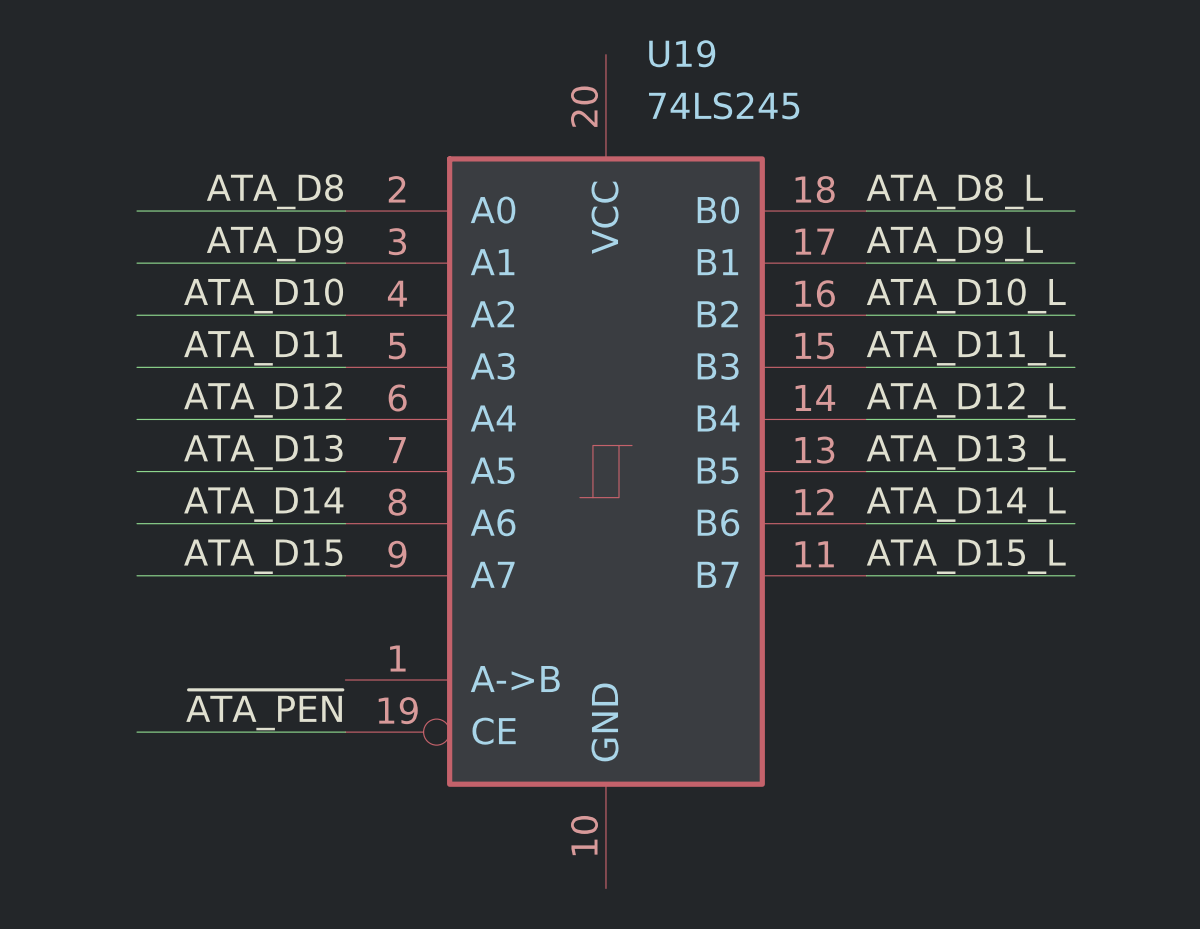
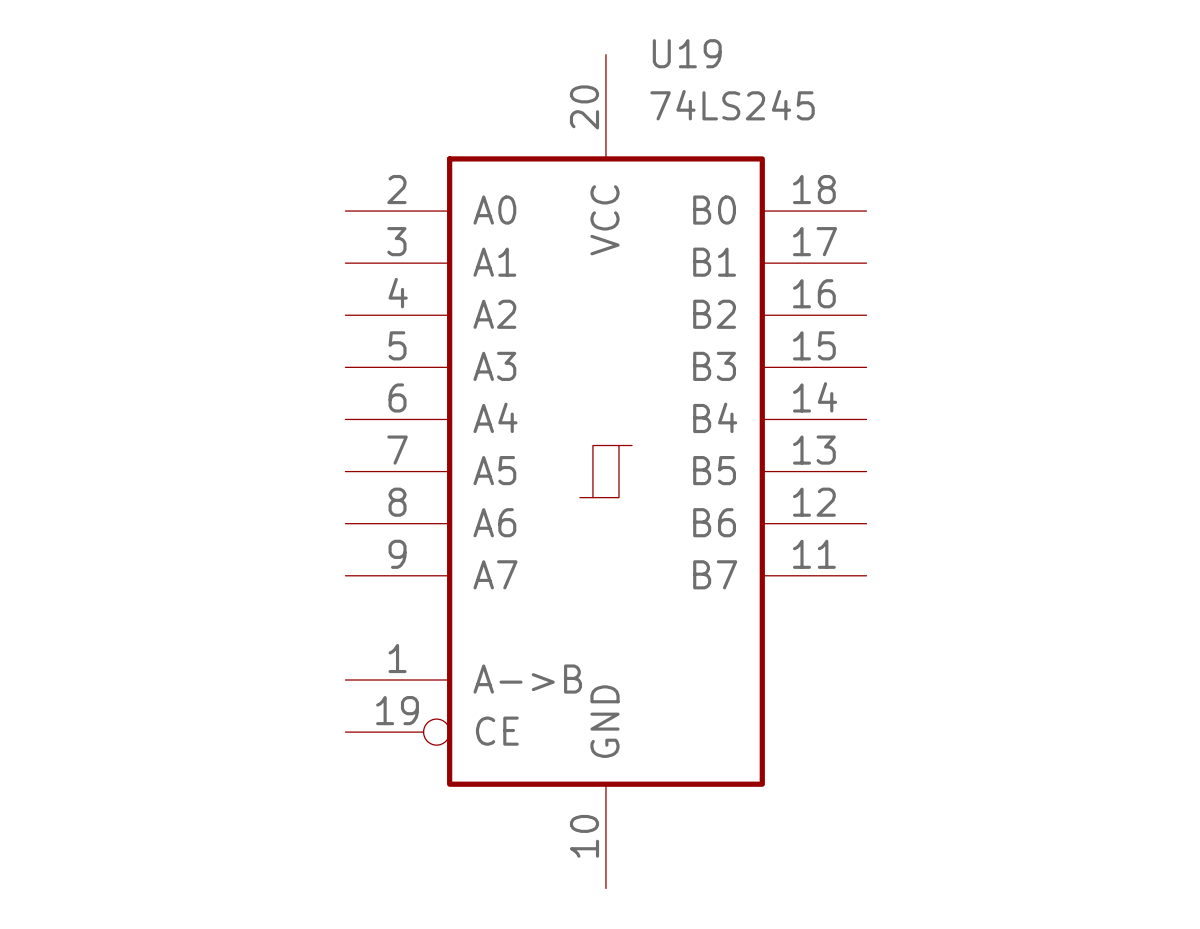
label: ATA_D8 (274, 191) -> none
label: ATA_D8_L (954, 191) -> none
wire: (136, 211) (345, 211) -> none
wire: (866, 211) (1074, 211) -> none
label: ATA_D9 (274, 243) -> none
label: ATA_D9_L (954, 243) -> none
wire: (136, 263) (345, 263) -> none
wire: (866, 263) (1074, 263) -> none
label: ATA_D10 (263, 295) -> none
label: ATA_D10_L (966, 295) -> none
wire: (136, 315) (345, 315) -> none
wire: (866, 315) (1074, 315) -> none
label: ATA_D11 (263, 348) -> none
label: ATA_D11_L (966, 348) -> none
wire: (136, 367) (345, 367) -> none
wire: (866, 367) (1074, 367) -> none
label: ATA_D12 (262, 400) -> none
label: ATA_D12_L (966, 400) -> none
wire: (136, 419) (345, 419) -> none
wire: (866, 419) (1074, 419) -> none
label: ATA_D13 (263, 452) -> none
label: ATA_D13_L (966, 452) -> none
wire: (136, 471) (345, 471) -> none
wire: (866, 471) (1074, 471) -> none
label: ATA_D14 (263, 504) -> none
label: ATA_D14_L (966, 504) -> none
wire: (136, 523) (345, 523) -> none
wire: (866, 523) (1074, 523) -> none
label: ATA_D15 (263, 556) -> none
label: ATA_D15_L (966, 556) -> none
wire: (136, 575) (345, 575) -> none
wire: (866, 575) (1074, 575) -> none
label: ~{ATA_PEN} (264, 710) -> none
wire: (136, 732) (345, 732) -> none

